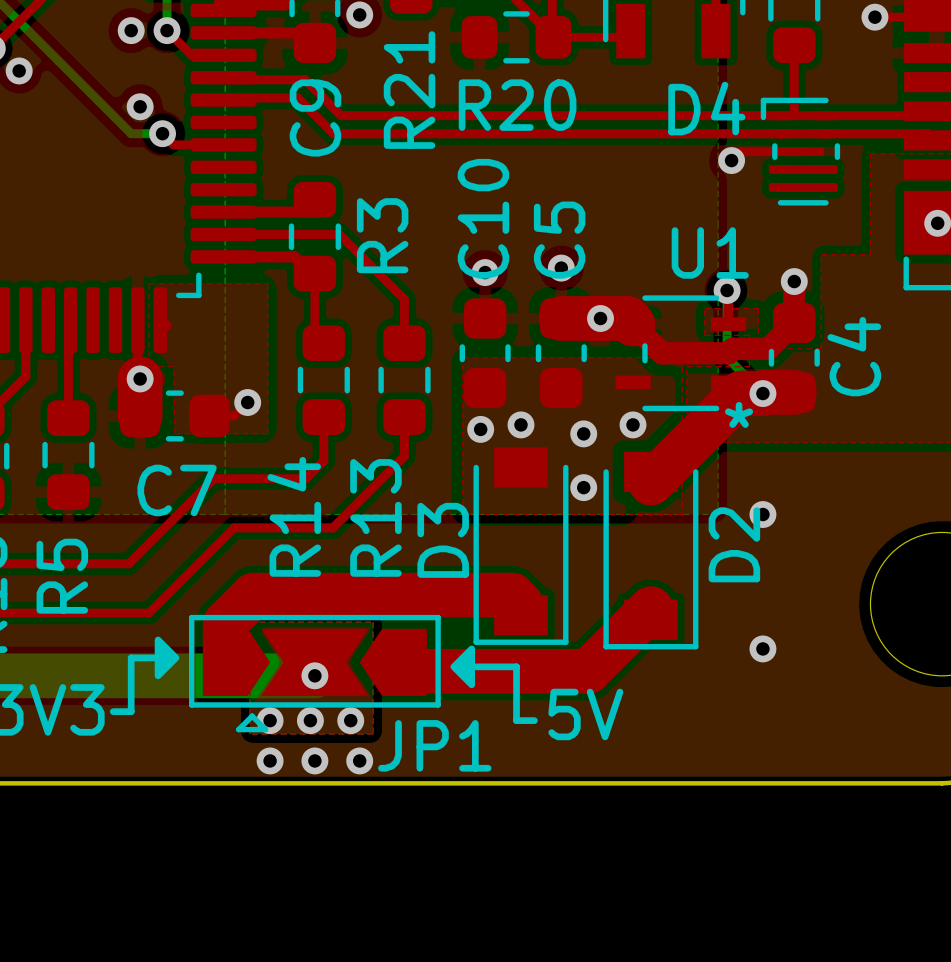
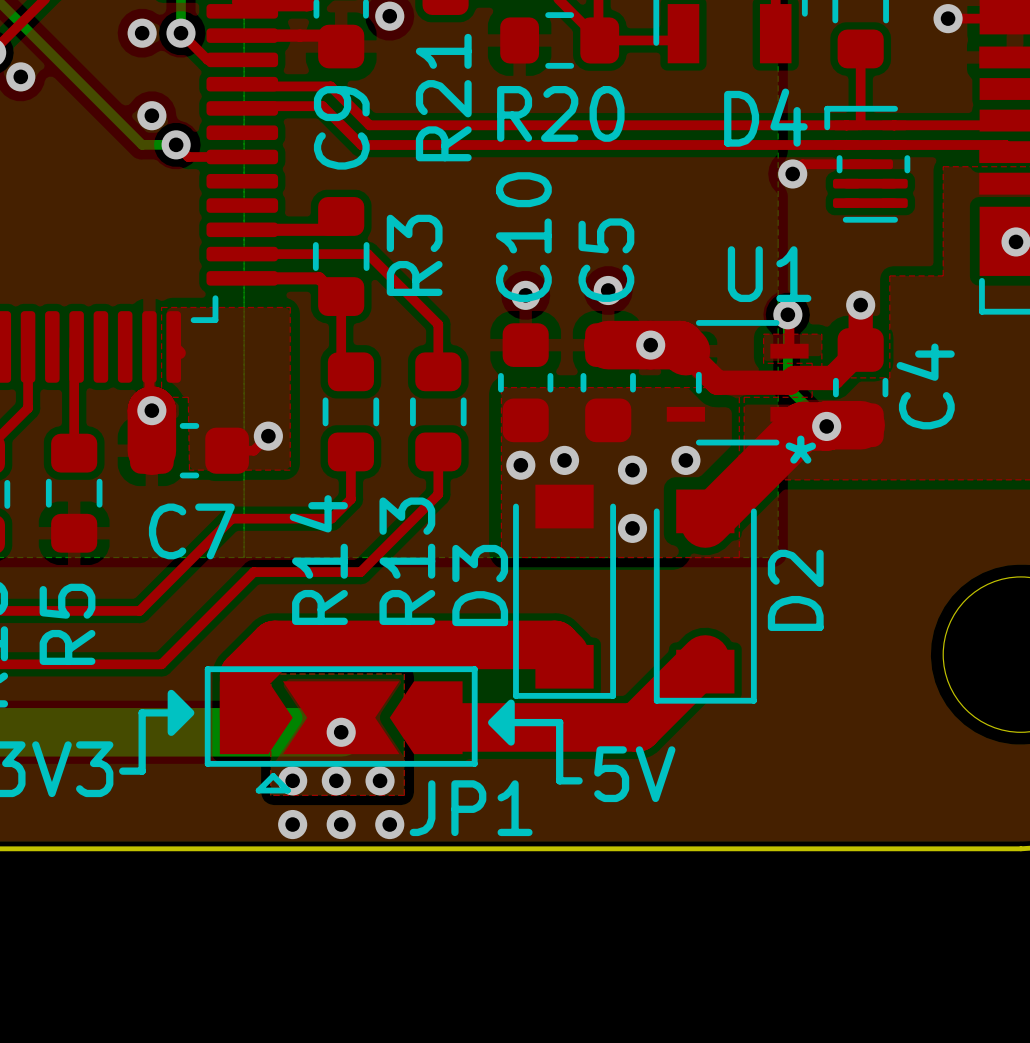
via: (762, 514) -> none
via: (762, 648) -> none

